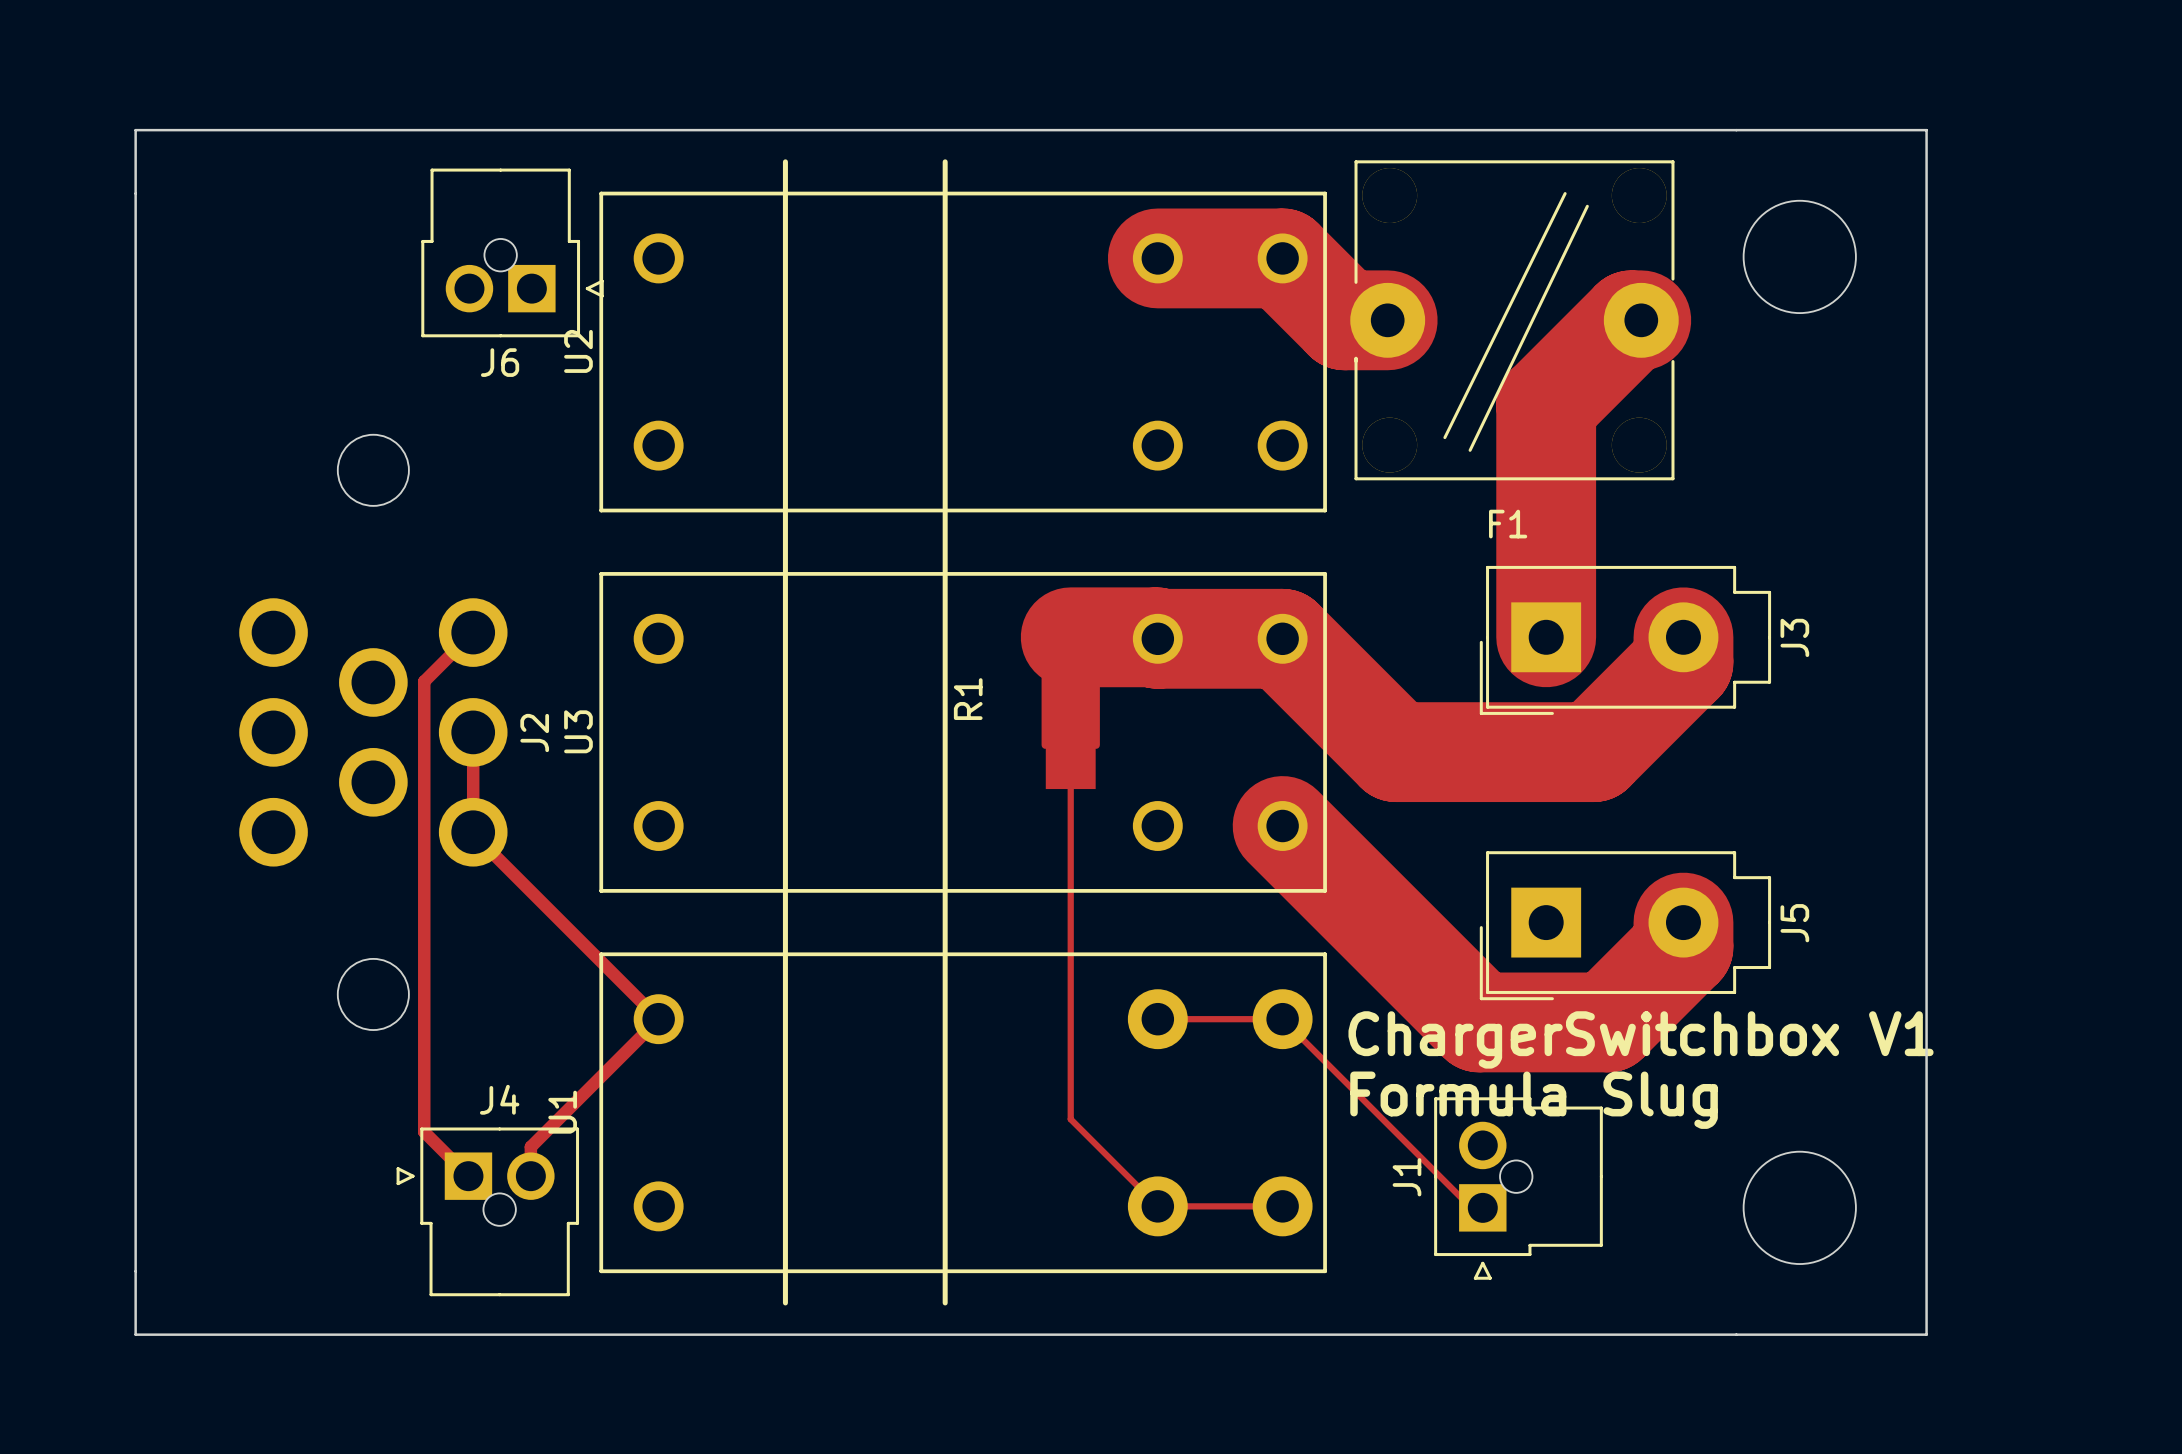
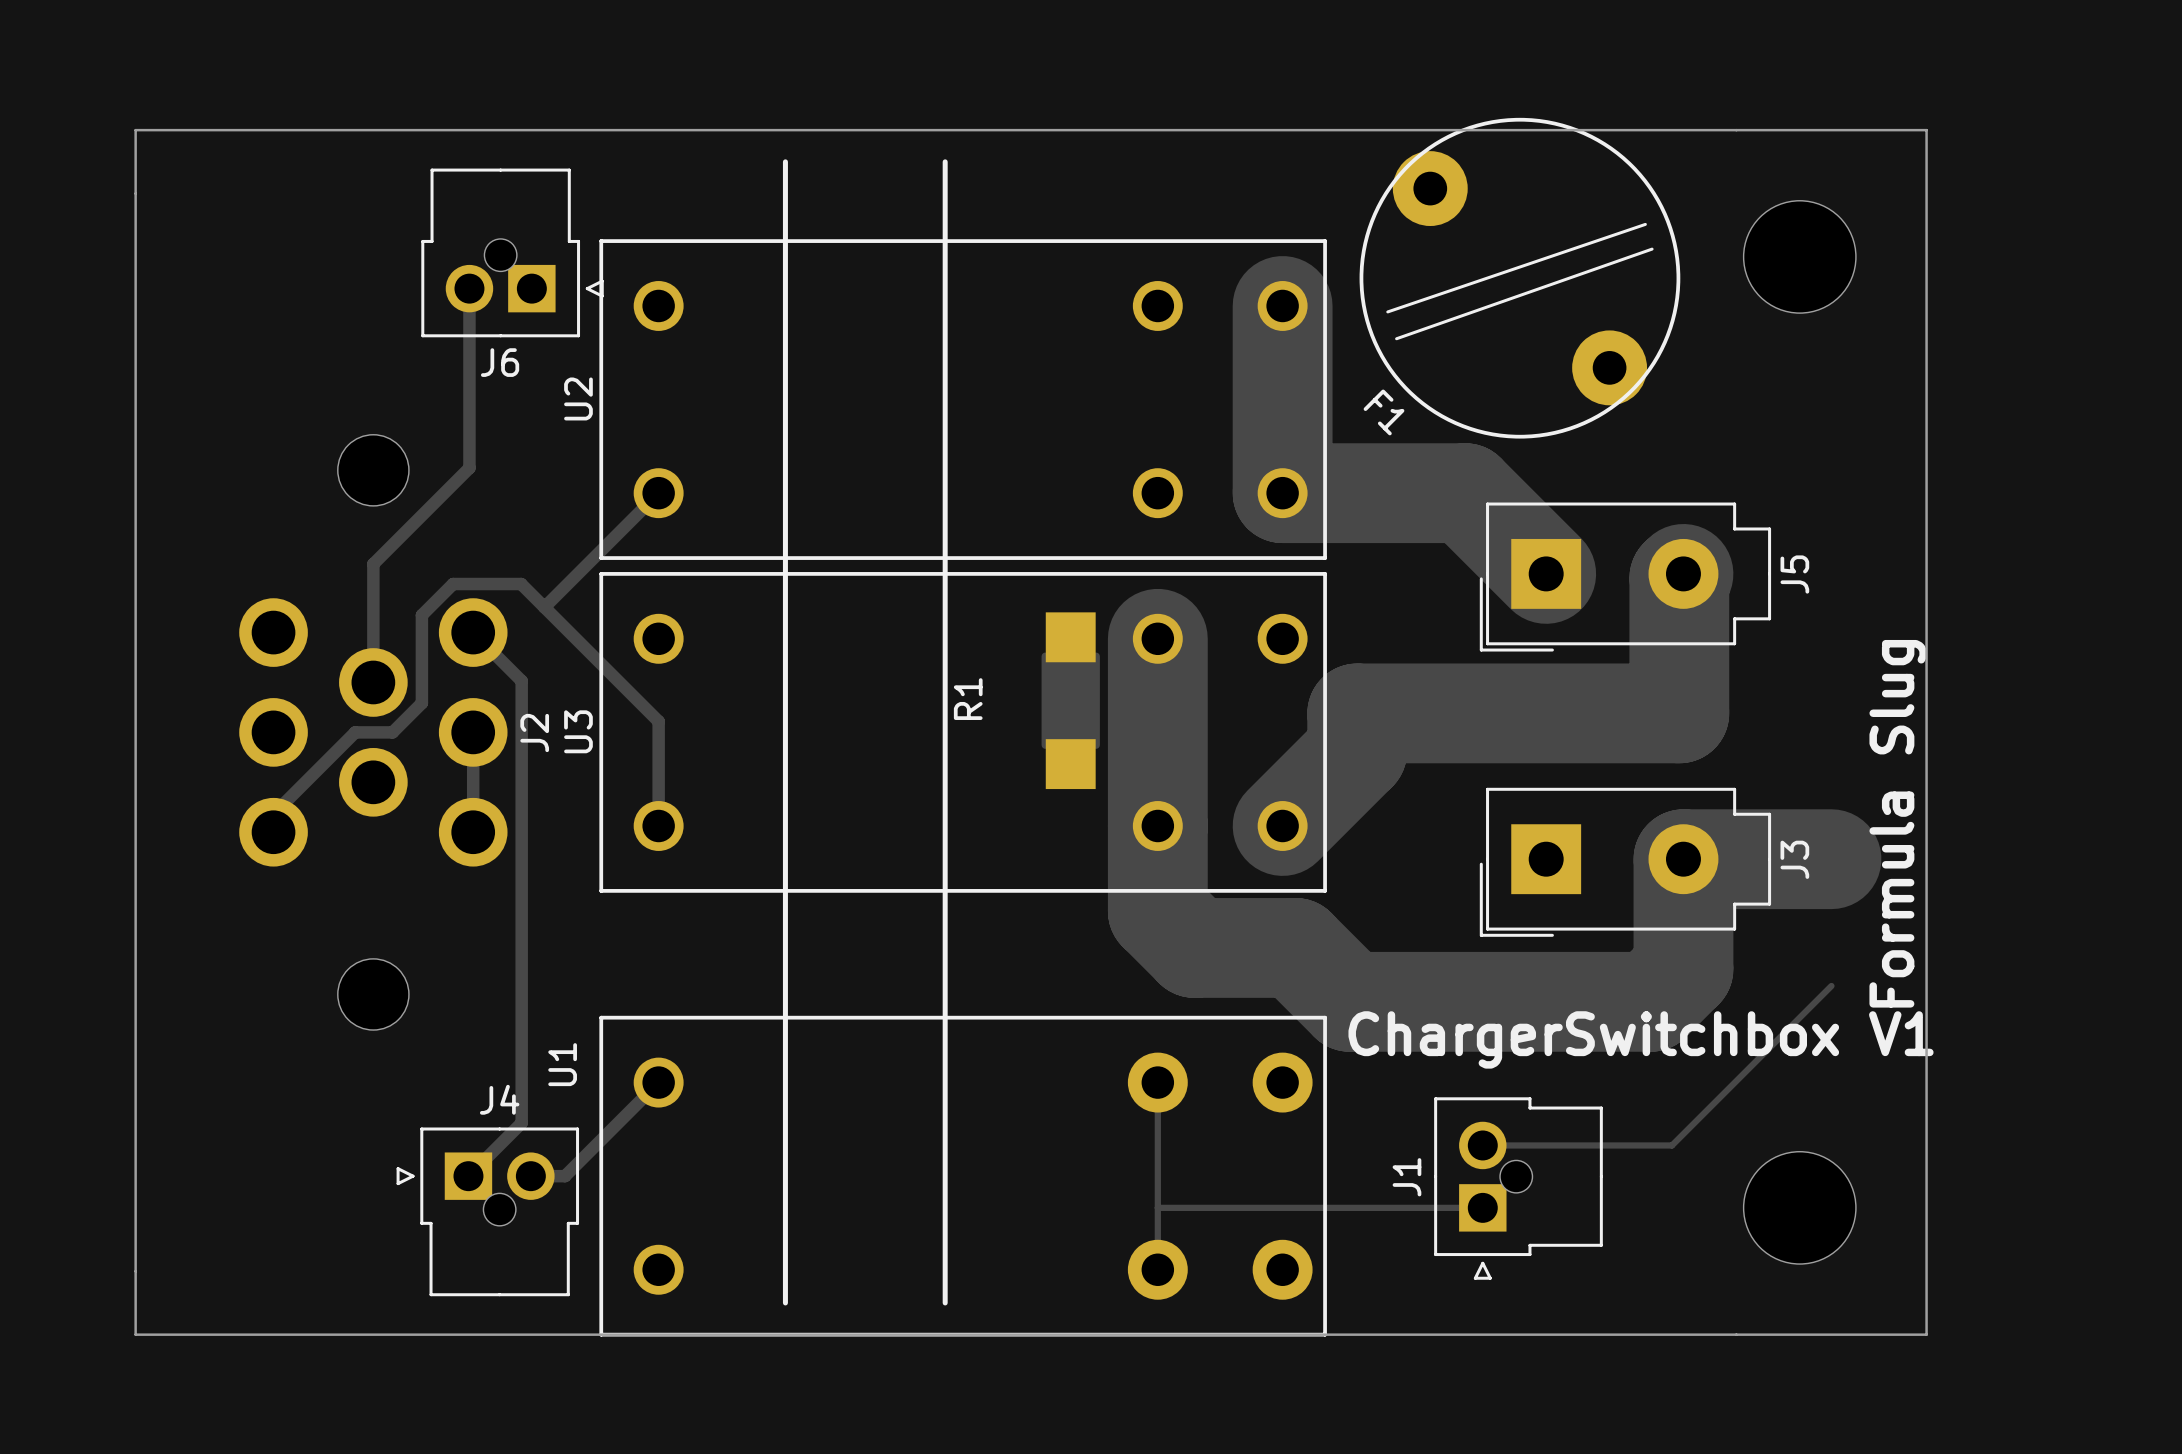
F1 footprint: [1350, 160, 1679, 481] -> [1359, 117, 1681, 439]
track: (1157, 258) (1282, 258) (1344, 320) (1387, 320) -> none
track: none -> (469, 288) (469, 467) (373, 564) (373, 682)
track: none -> (1282, 305) (1282, 493) (1465, 493) (1546, 573)
track: (1641, 320) (1631, 320) (1546, 405) (1546, 637) -> none
U2 position: (963, 352) -> (963, 399)
track: none -> (658, 493) (544, 607)
F1 name position: F1 (1508, 524) -> F1 (1384, 412)
track: none -> (1683, 573) (1679, 578) (1679, 713) (1357, 713) (1357, 751) (1282, 825)
track: (473, 632) (424, 681) (424, 1131) (468, 1176) -> (473, 632) (521, 681) (521, 1122) (468, 1176)
track: (1070, 637) (1282, 638) (1395, 752) (1593, 752) (1683, 662) (1683, 637) -> none
J3 position: (1625, 640) -> (1625, 862)
track: (1070, 764) (1070, 1119) (1157, 1206) (1282, 1206) -> none
track: none -> (658, 825) (658, 721) (521, 584) (453, 584) (421, 615) (421, 703) (392, 732) (355, 732) (273, 814) (273, 832)
track: (1282, 825) (1479, 1022) (1608, 1022) (1683, 946) -> (1157, 638) (1157, 911) (1194, 947) (1295, 947) (1349, 1001) (1650, 1001) (1683, 969) (1683, 946)
track: (473, 832) (658, 1019) (530, 1146) (530, 1176) -> (658, 1082) (565, 1176) (530, 1176)
track: none -> (1831, 859) (1683, 859) (1683, 922)
J5 position: (1625, 925) -> (1625, 577)
track: none -> (1831, 985) (1671, 1145) (1482, 1145)
track: (1157, 1019) (1282, 1019) (1471, 1207) -> (1157, 1207) (1471, 1207)
track: none -> (1157, 1082) (1157, 1269)
text rotation: 0° (1534, 1100) -> 90° counterclockwise (1898, 823)
U1 name position: U1 (562, 1112) -> U1 (562, 1064)
U1 position: (963, 1112) -> (963, 1176)

